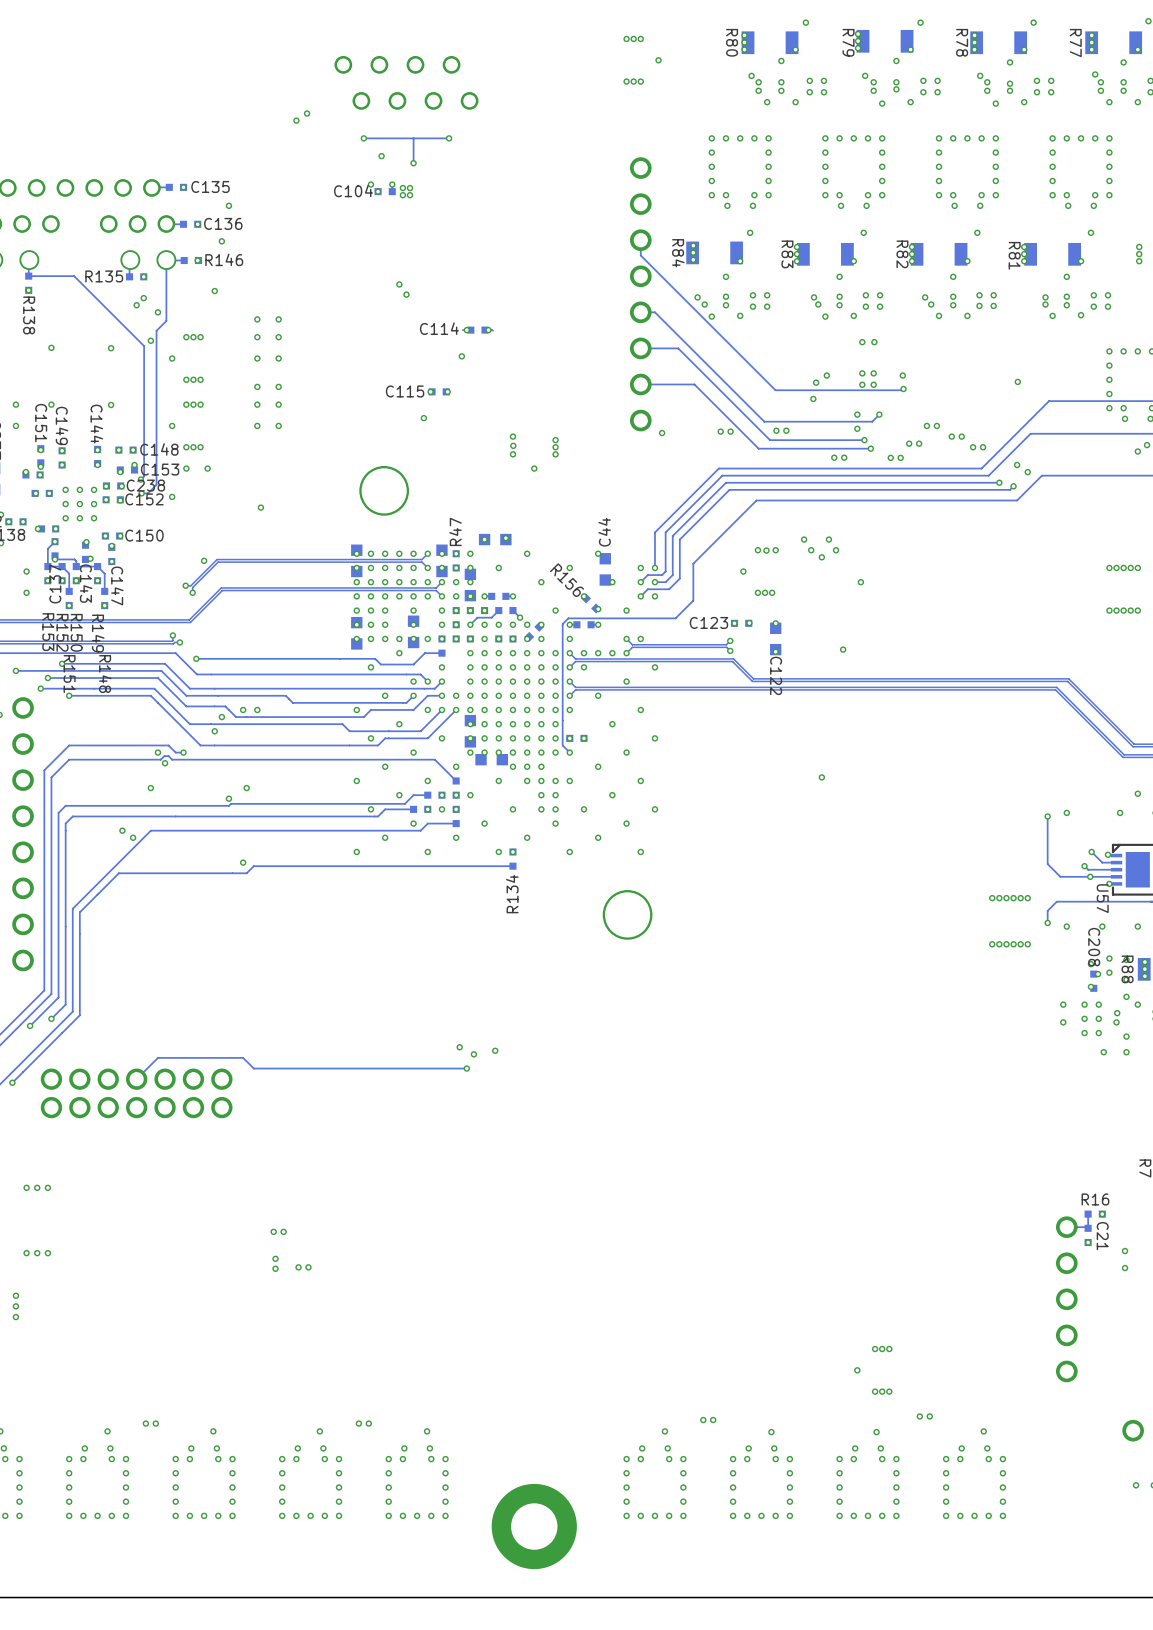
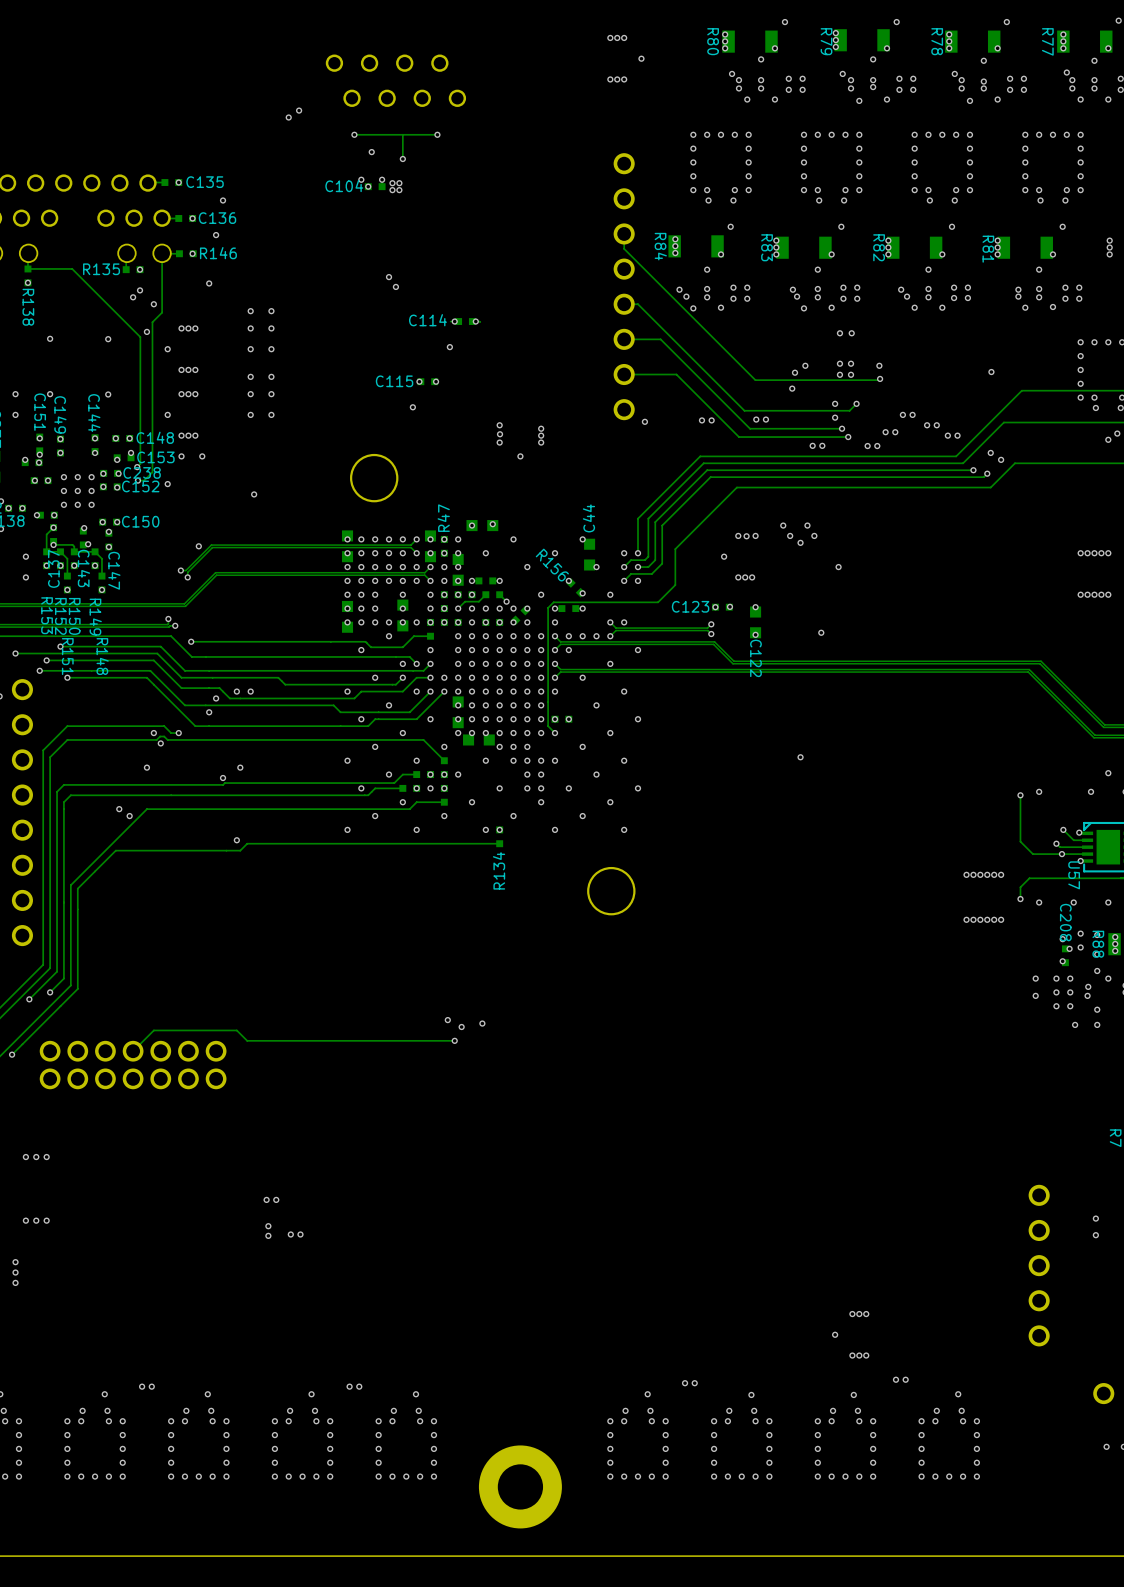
track: (1088, 1214) (1088, 1228) (1066, 1227) -> none
R16: (1095, 1214) -> none
via: (1102, 1214) -> none
C21: (1088, 1235) -> none
via: (1088, 1242) -> none

